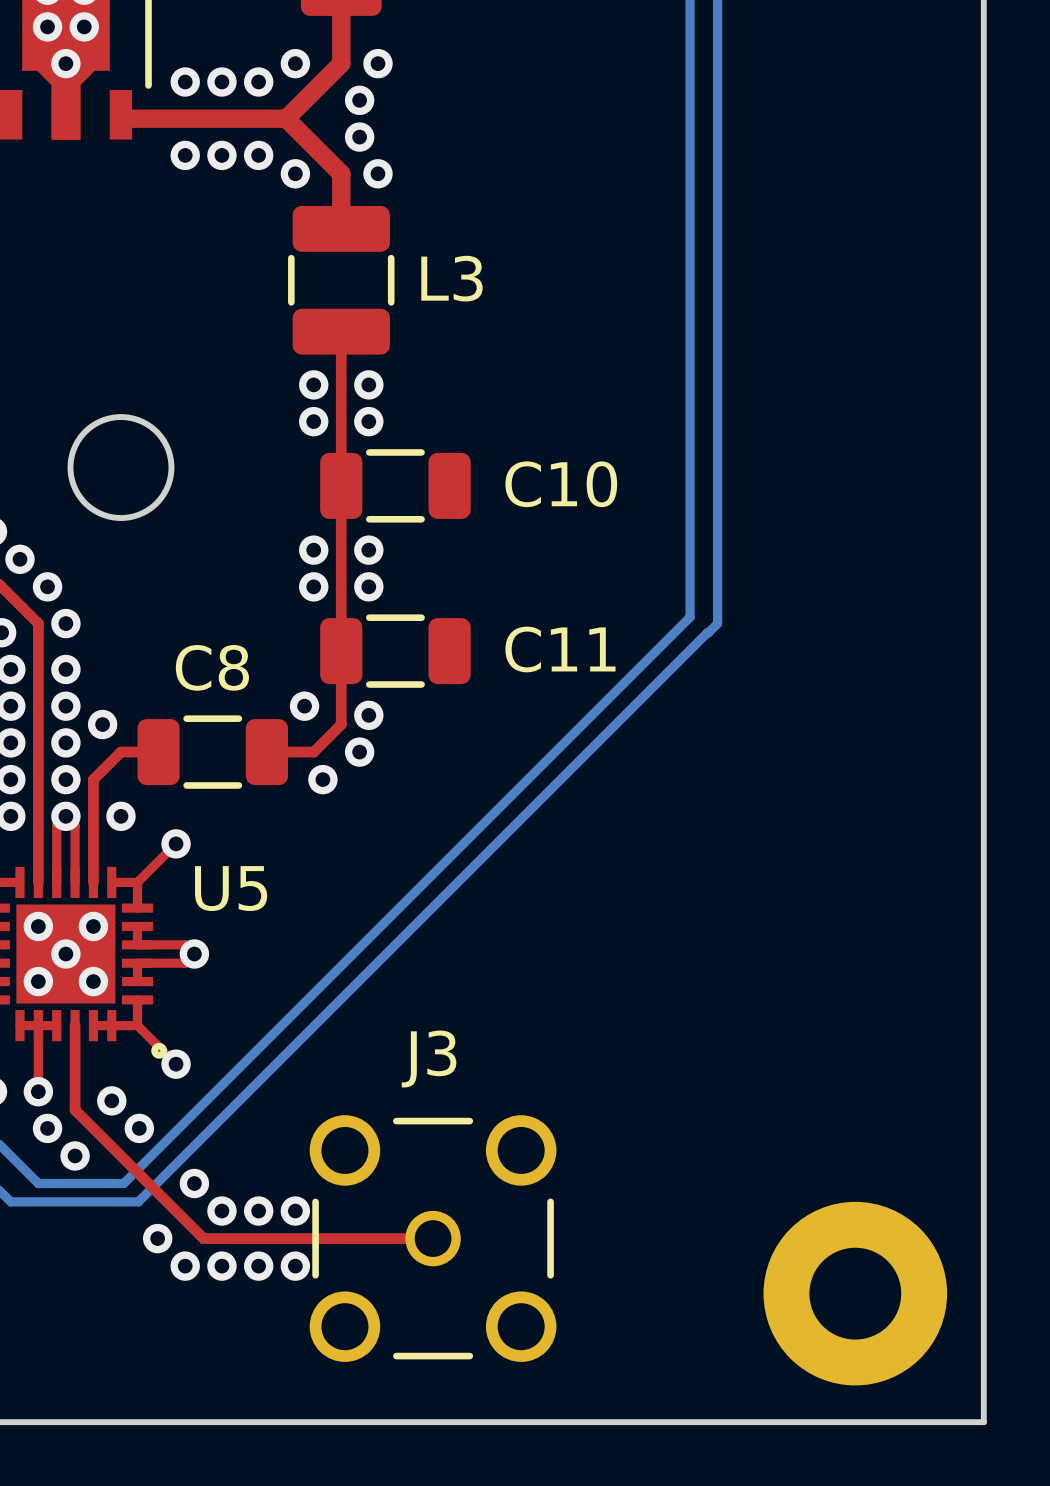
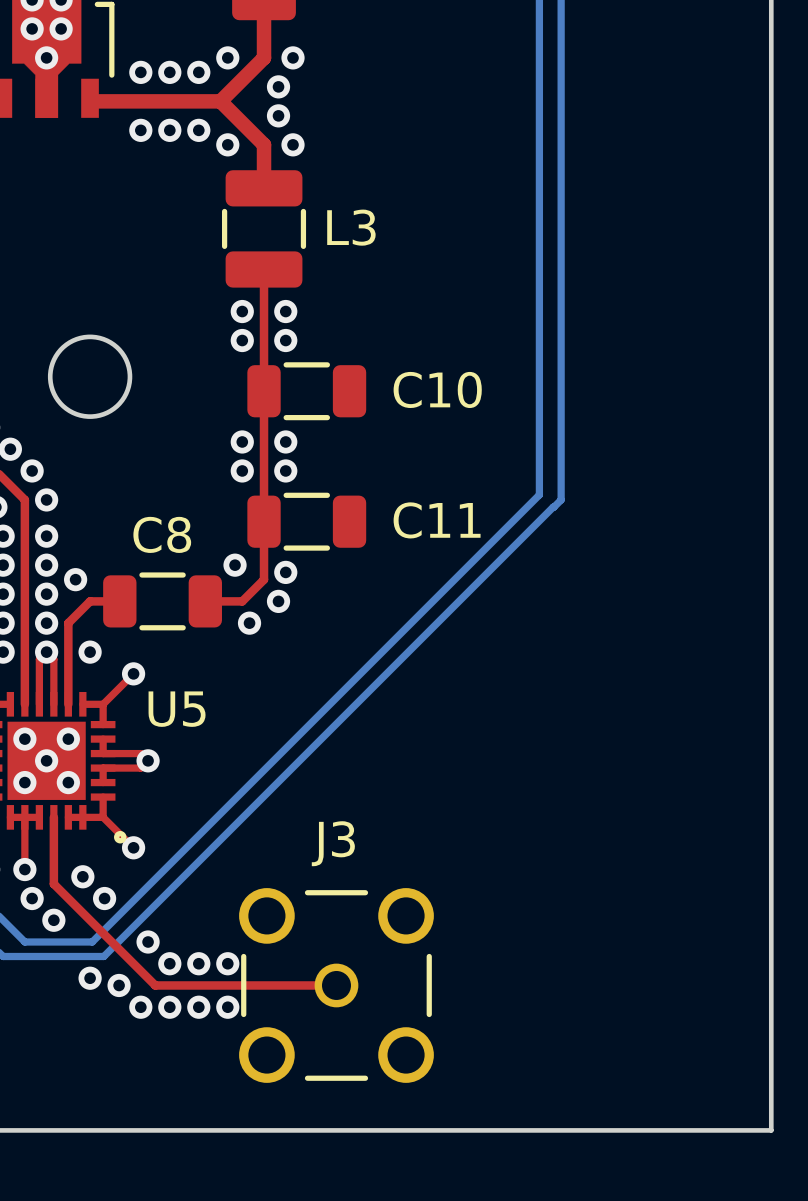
via: none -> (90, 978)
part: (855, 1293) -> none

